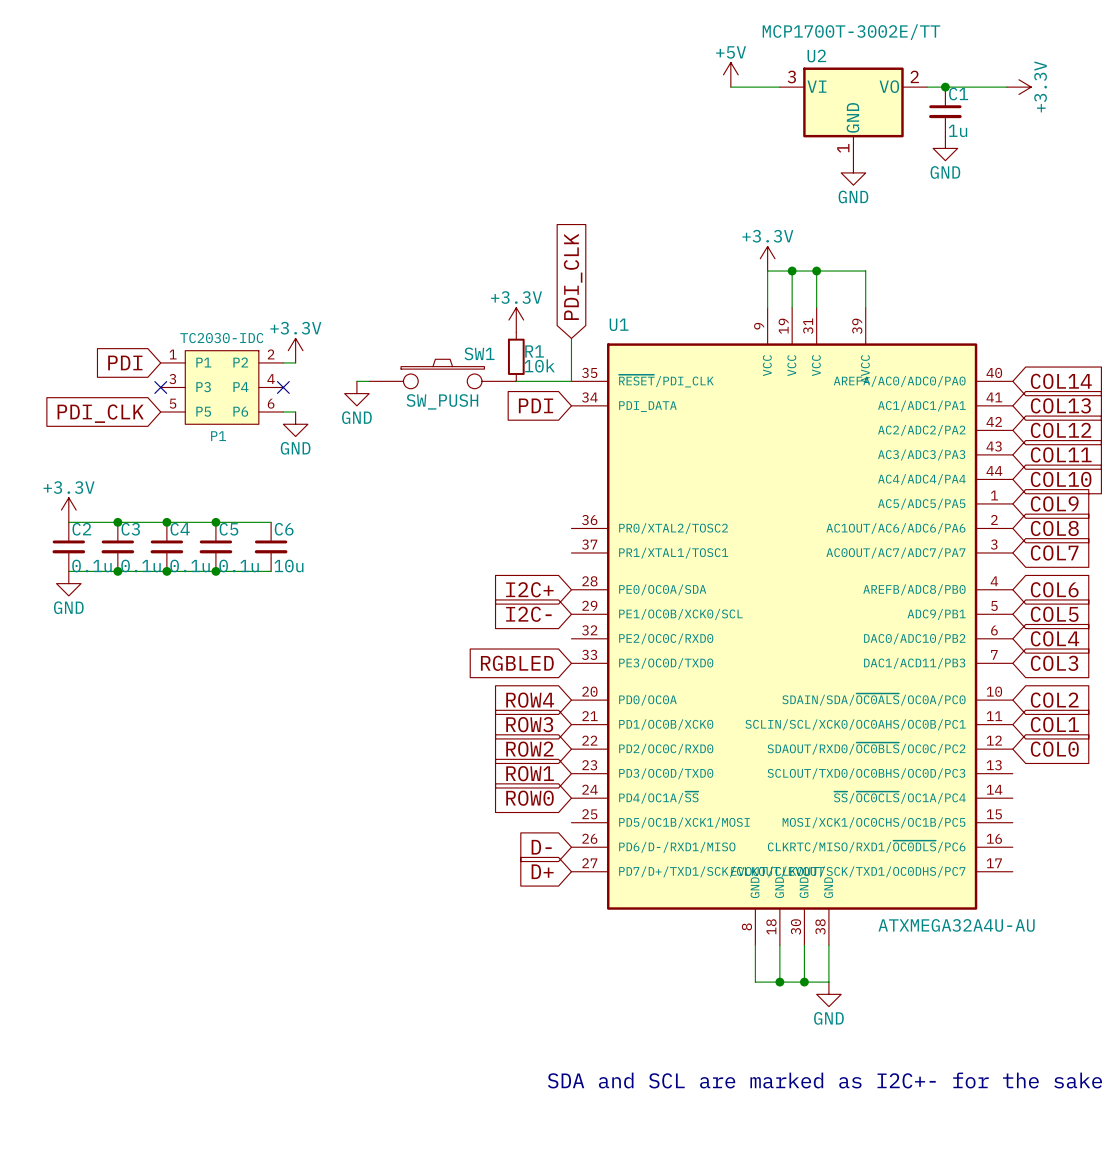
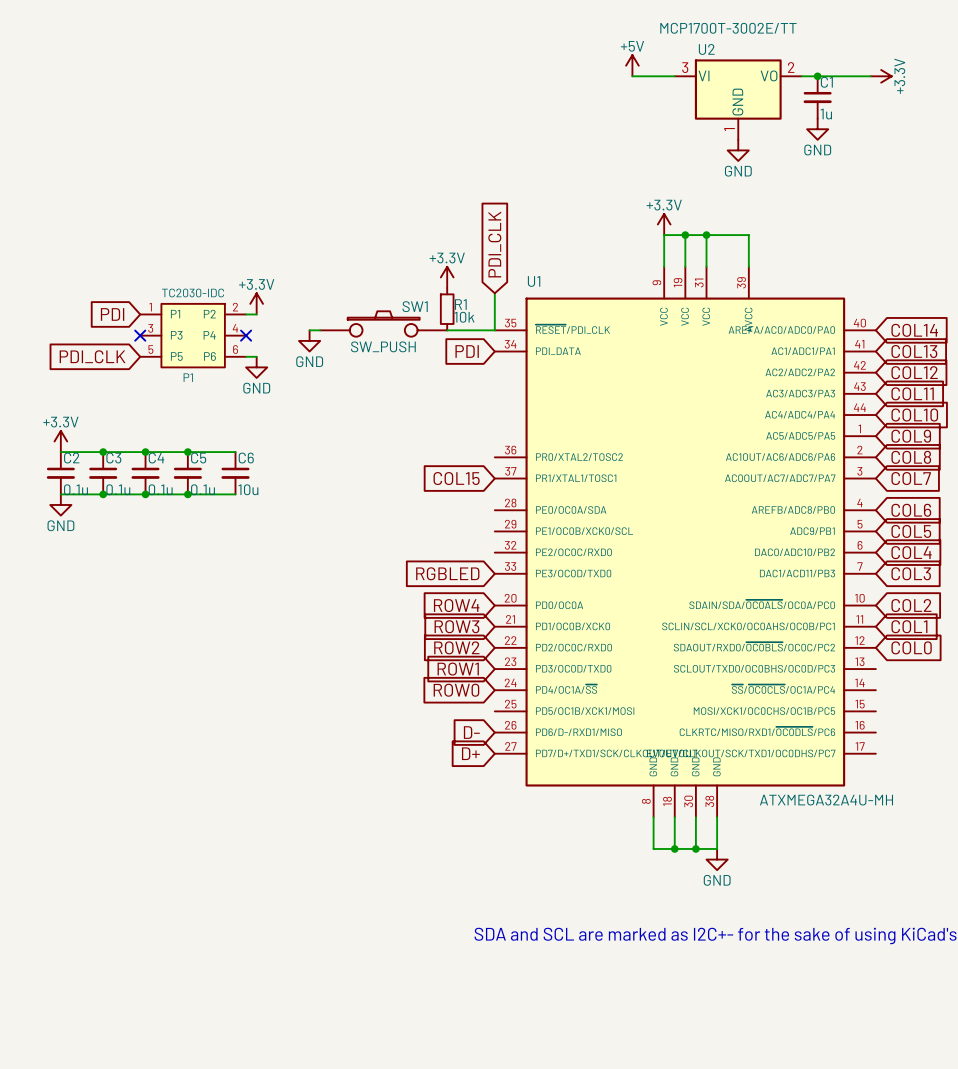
global label: none -> COL15 (456, 478)
global label: I2C+ (529, 589) -> none
global label: I2C- (528, 614) -> none
U1 value: ATXMEGA32A4U-AU (956, 925) -> ATXMEGA32A4U-MH (826, 800)

